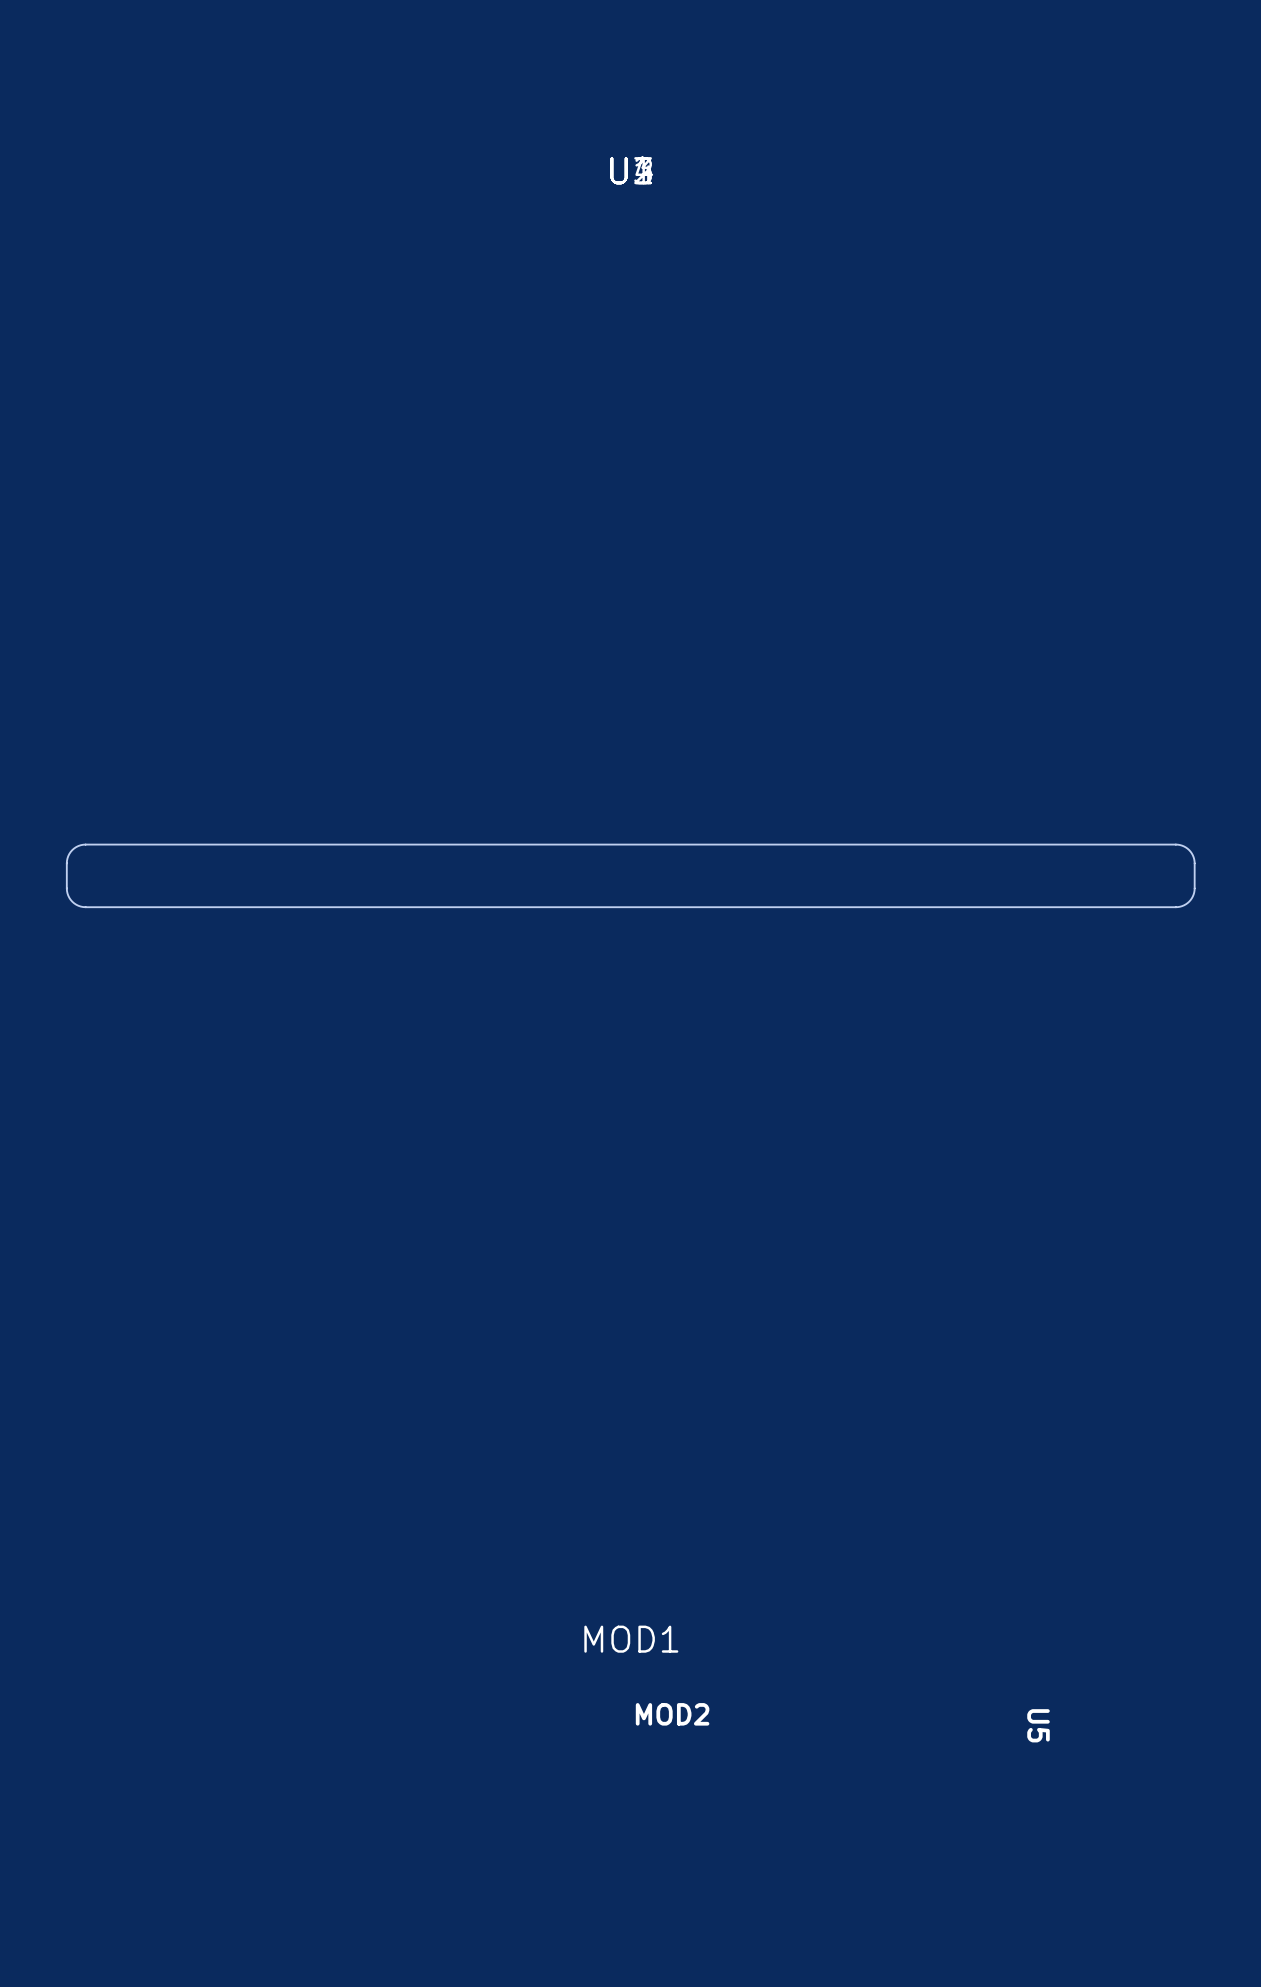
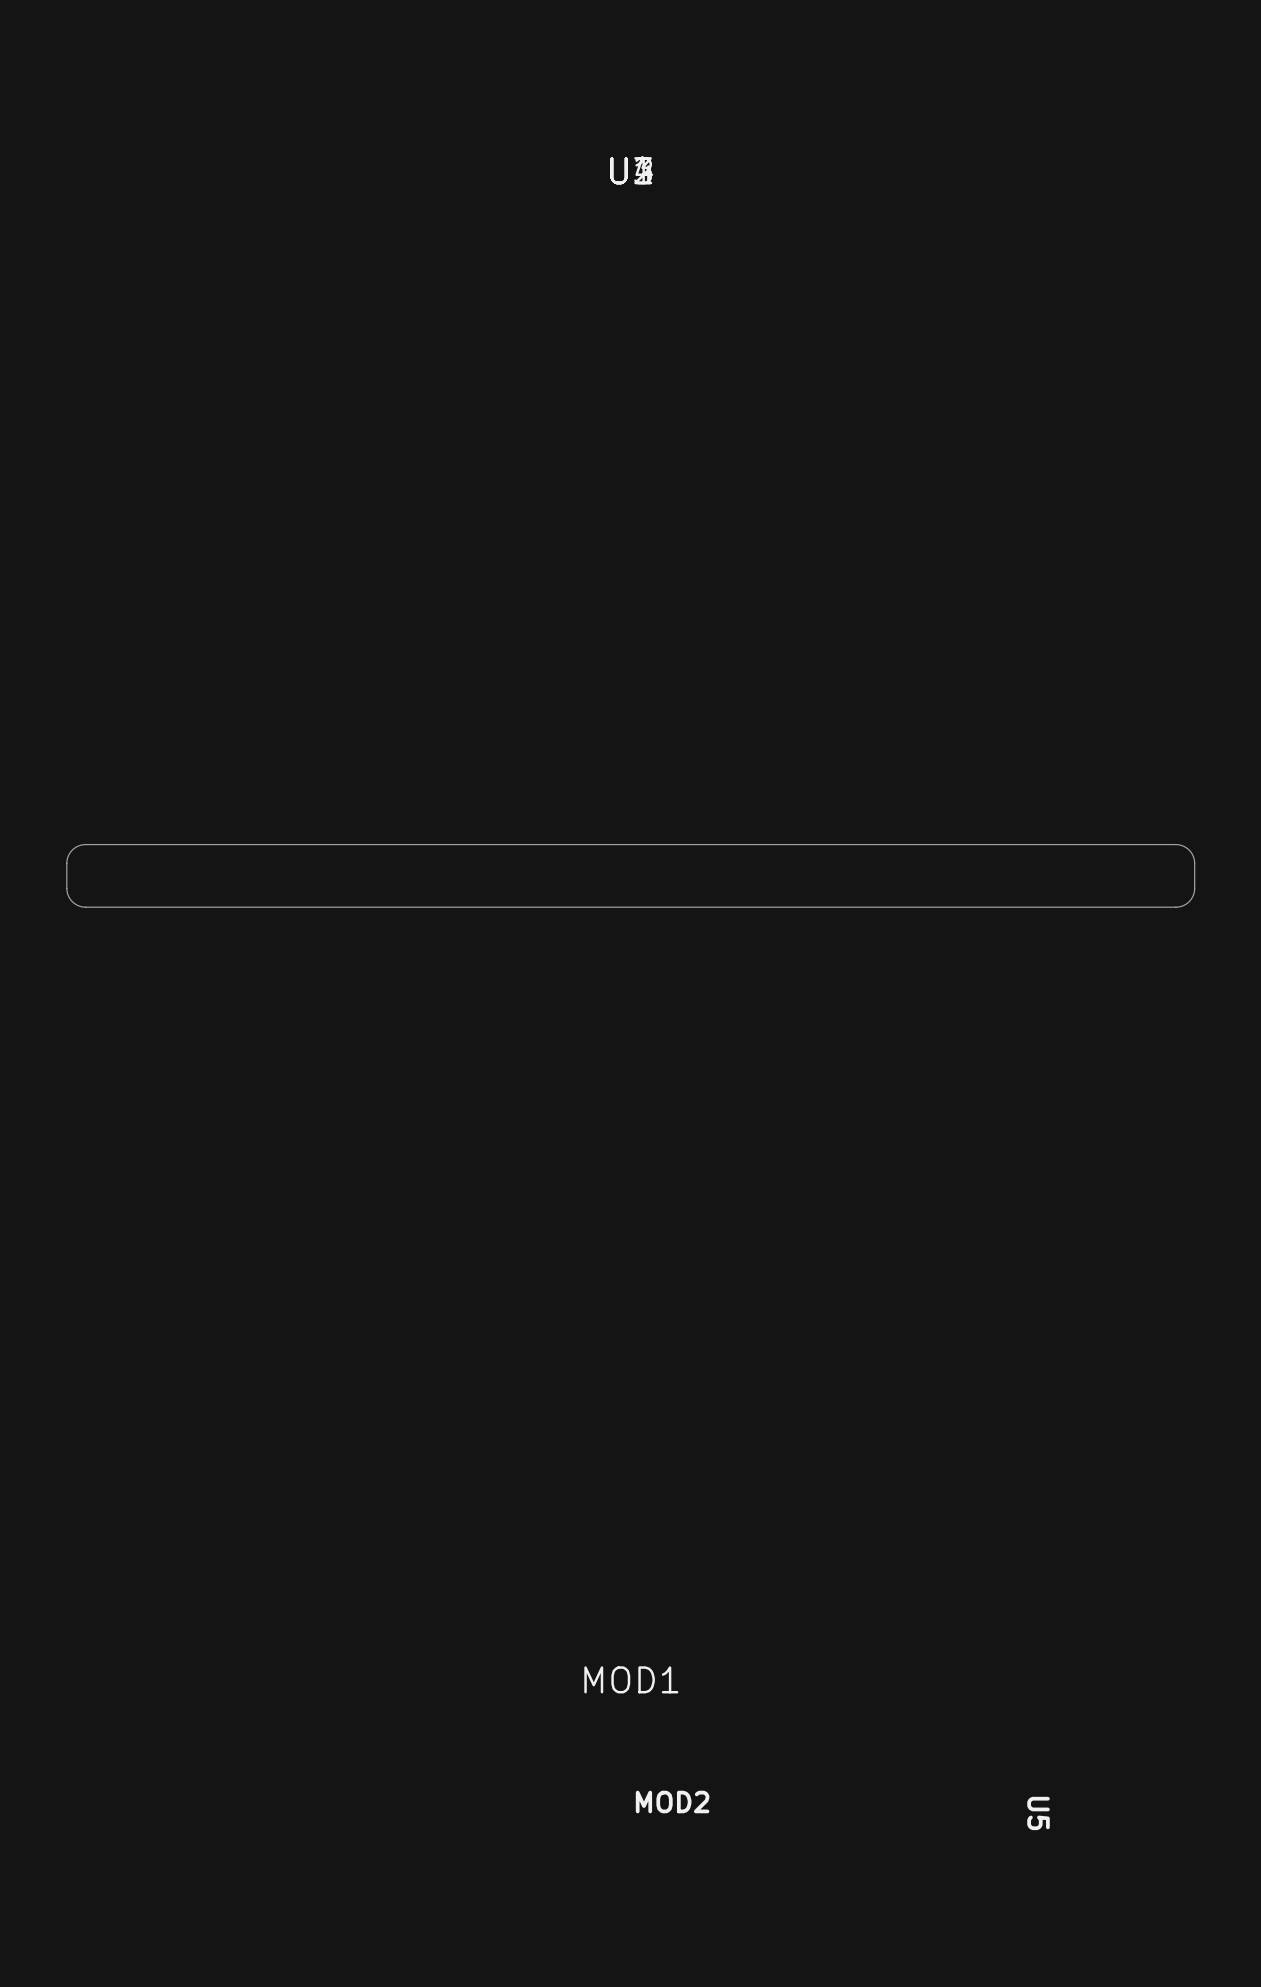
MOD1 position: (631, 1639) -> (631, 1679)
MOD2 position: (672, 1714) -> (672, 1802)
U5 position: (1038, 1725) -> (1038, 1813)

